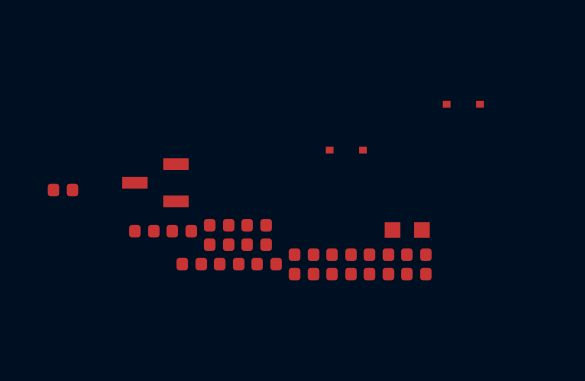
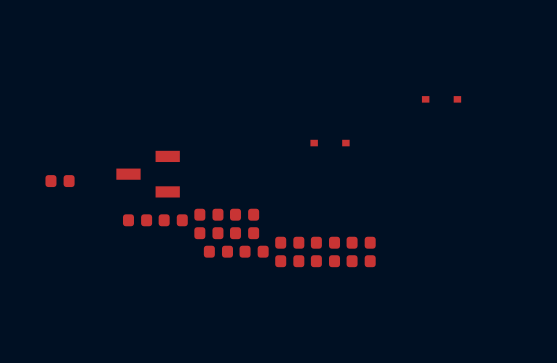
part: (407, 229) -> none
part: (416, 254) -> none
part: (191, 264) -> none
part: (416, 274) -> none

